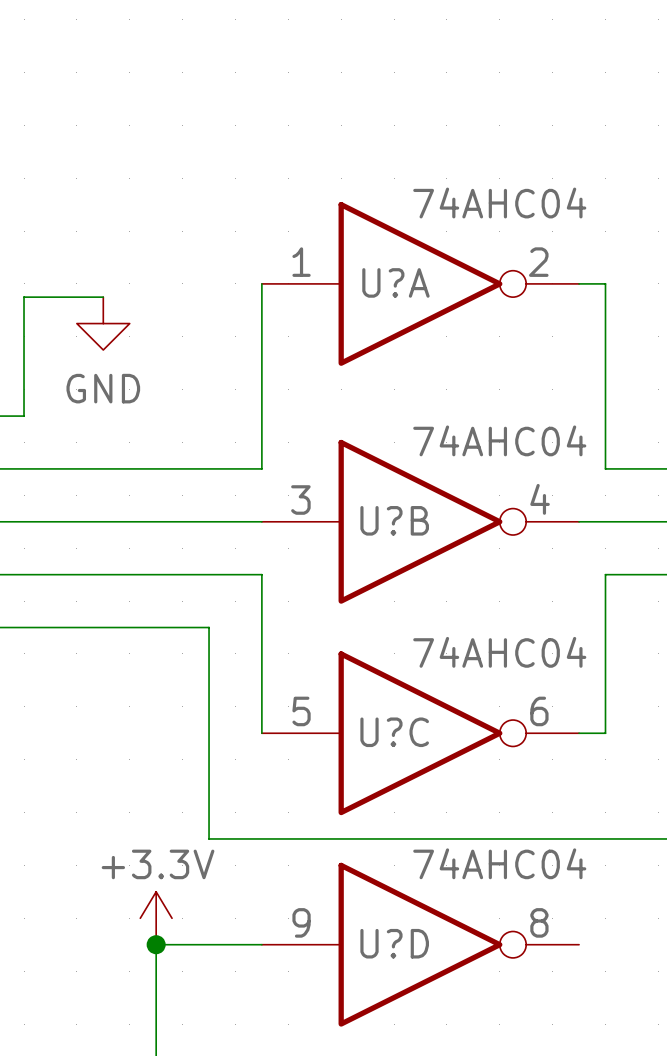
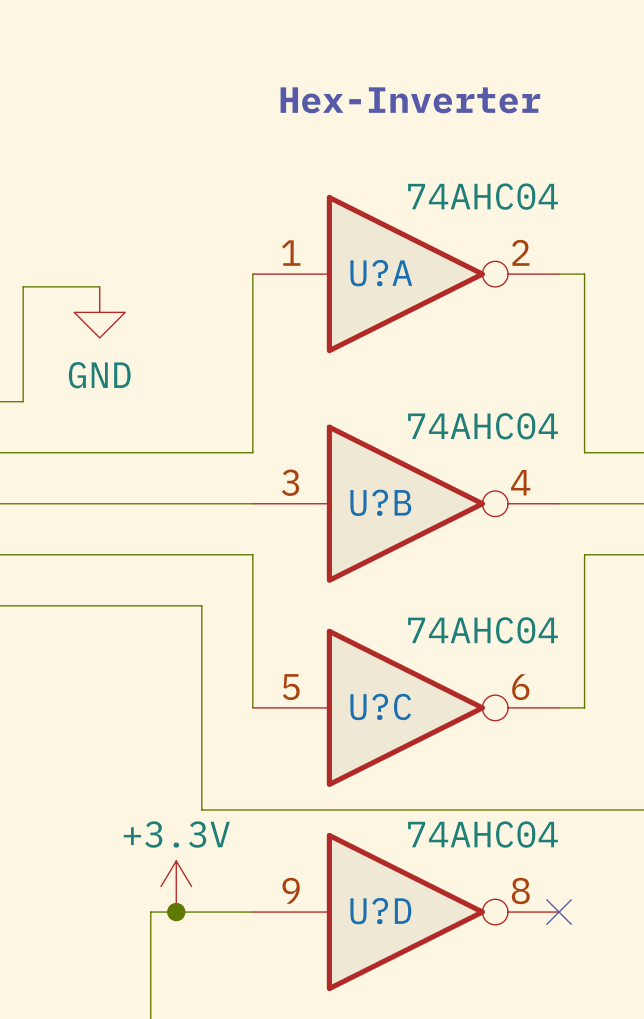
text: none -> Hex-Inverter (410, 100)
power symbol position: +3.3V (156, 918) -> +3.3V (176, 886)
junction position: (156, 944) -> (176, 912)
no-connect mark: none -> (559, 912)

